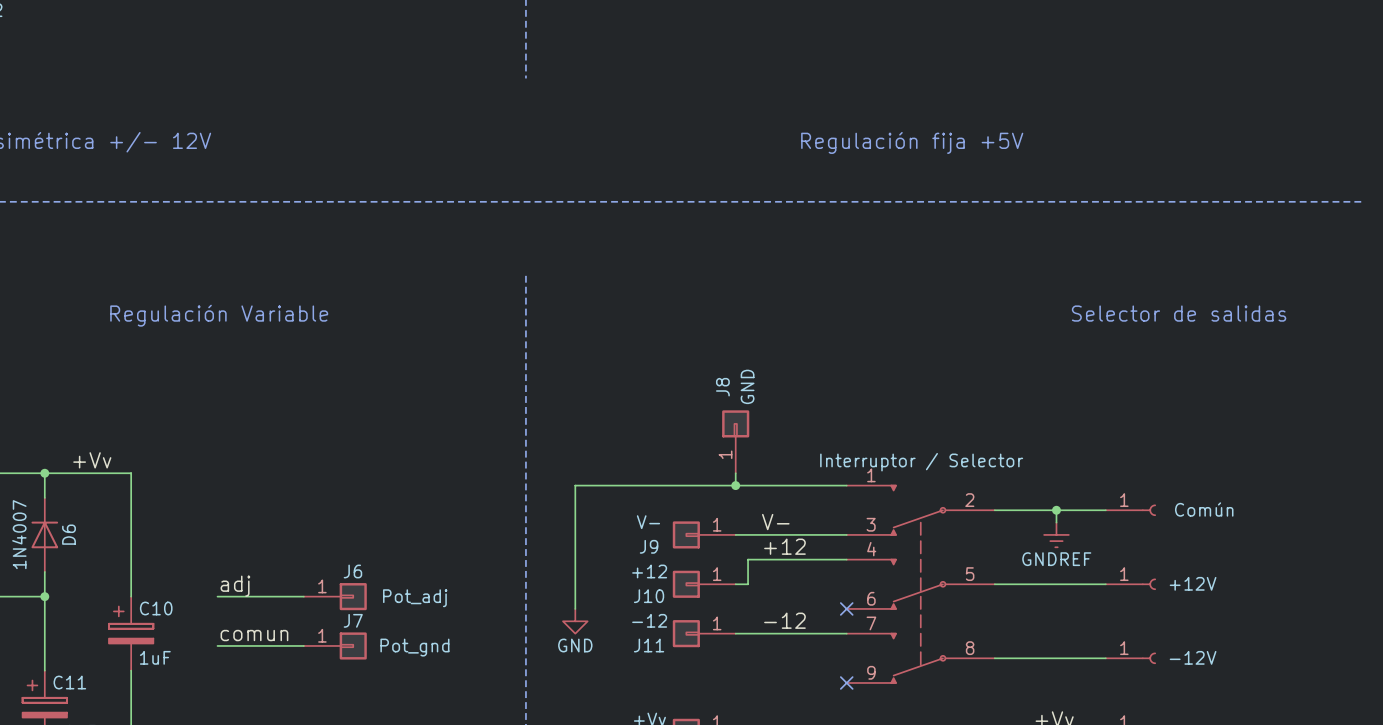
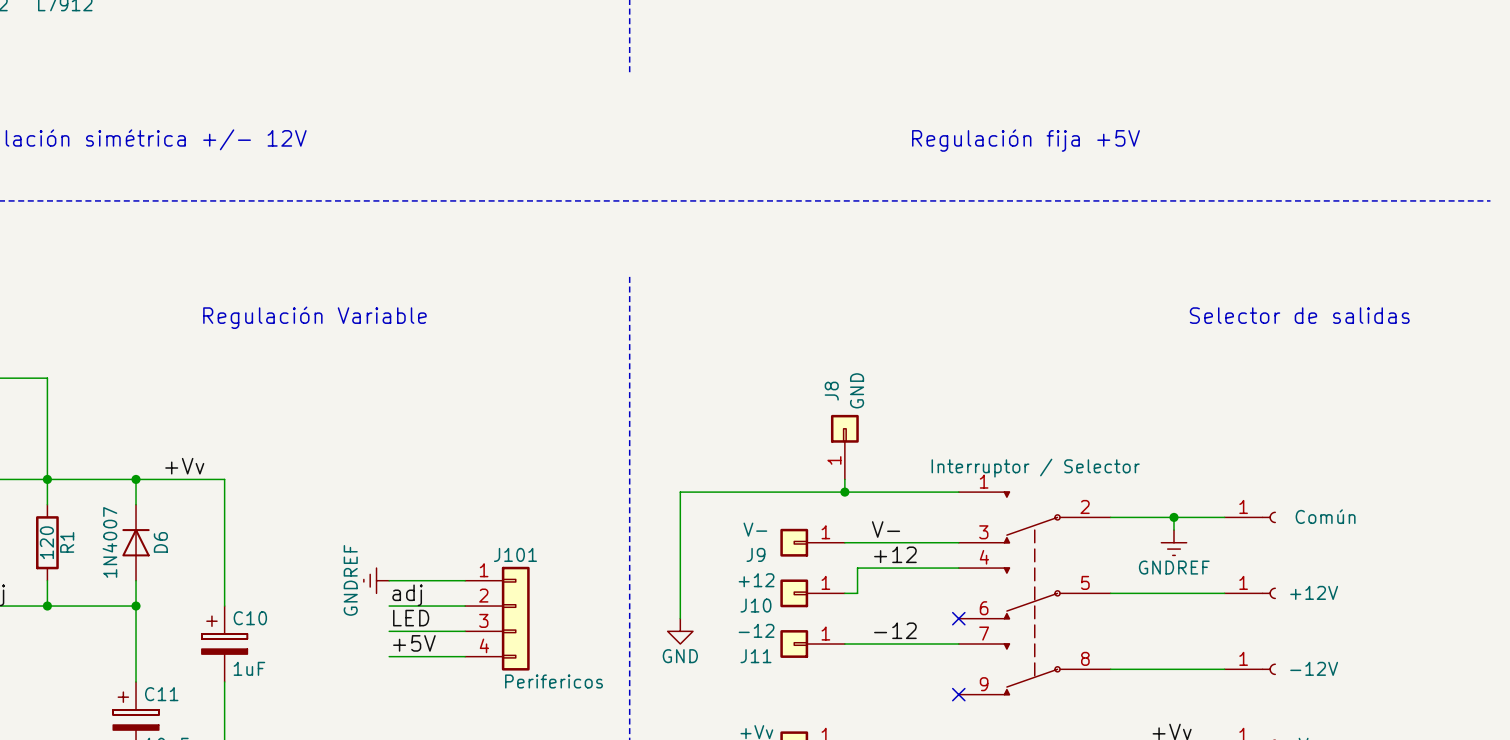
power symbol: none -> GNDREF (376, 580)
label position: adj (235, 586) -> adj (407, 595)
wire: (217, 596) (291, 596) -> (389, 631) (465, 631)
J6: Pot_adj (335, 596) -> none
label: none -> LED (411, 618)
J101: none -> Perifericos (497, 618)
label: none -> +5V (414, 643)
label: comun (254, 635) -> none
wire: (217, 645) (291, 645) -> (389, 580) (465, 580)
J7: Pot_gnd (335, 645) -> none

